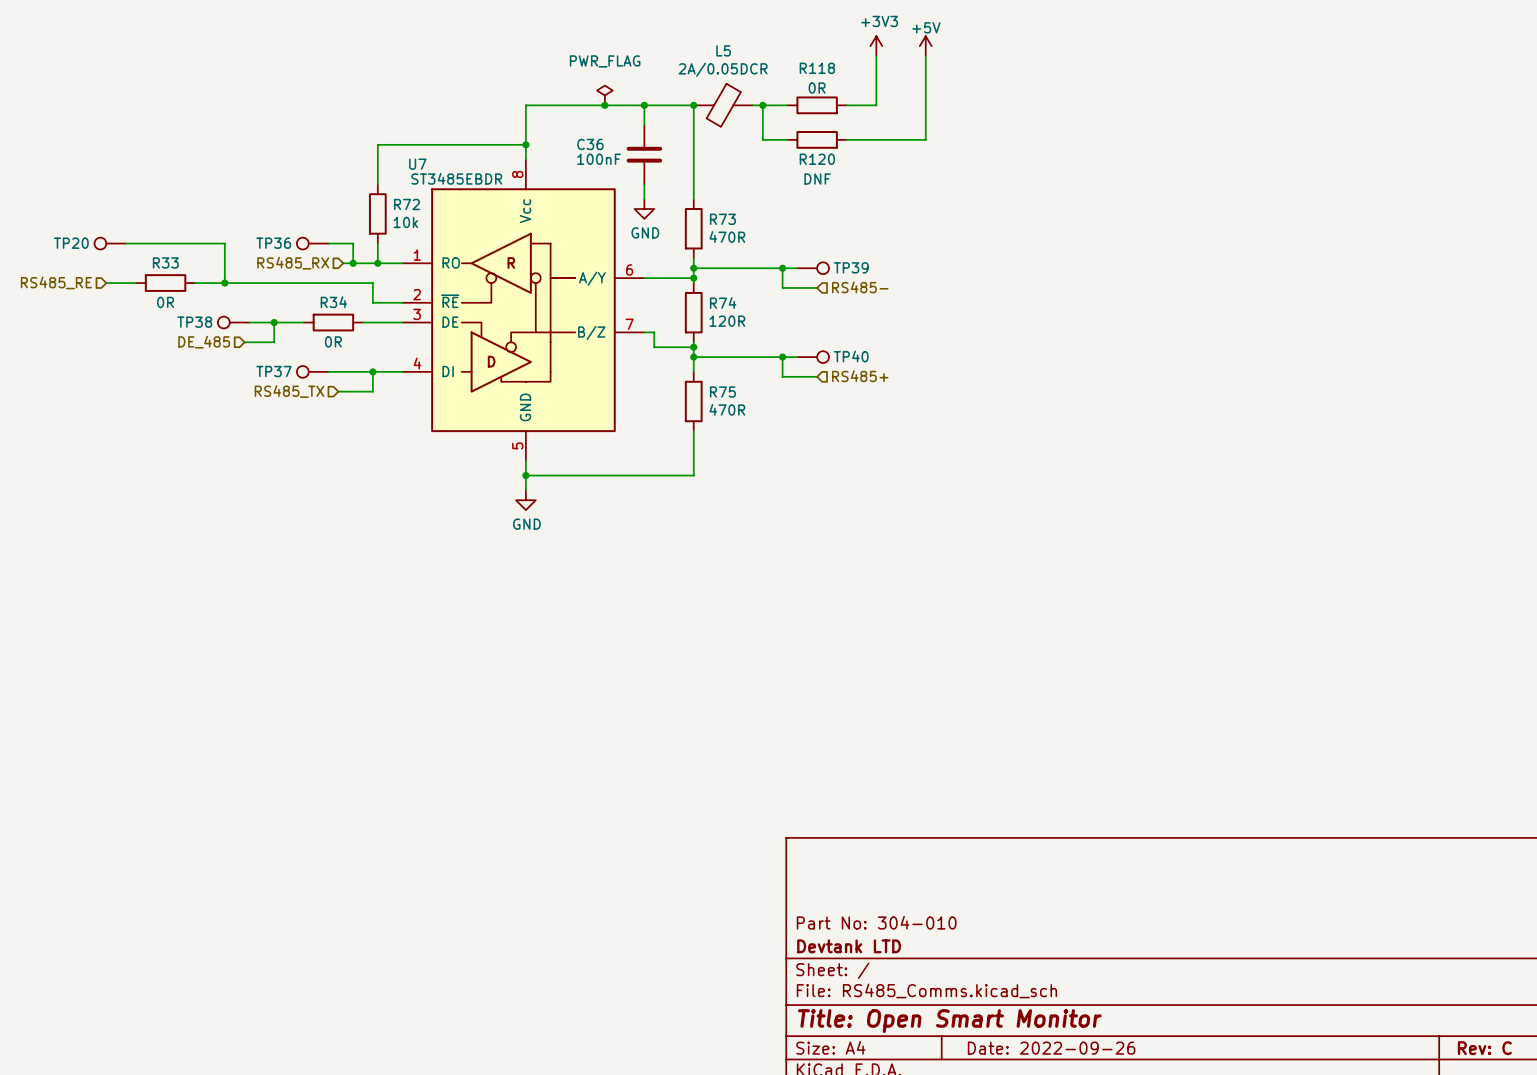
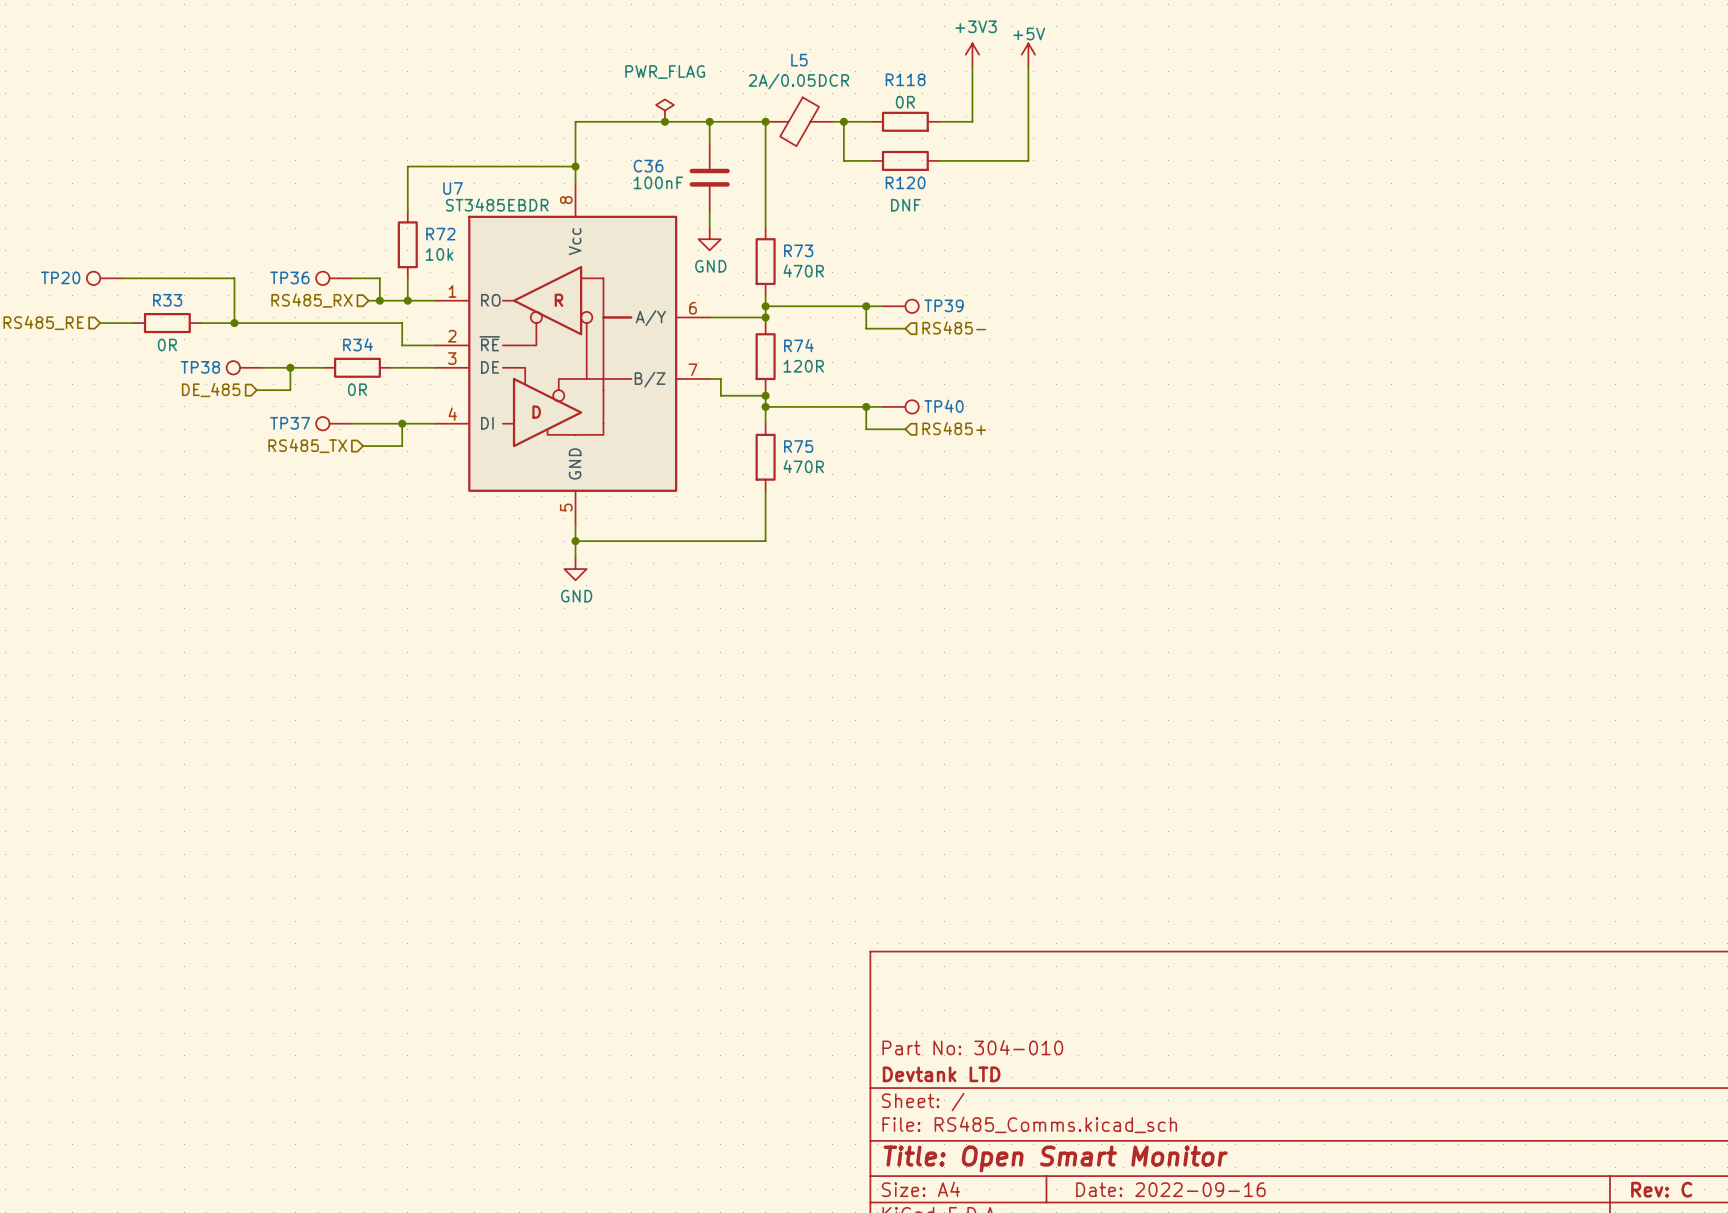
title block: Date: 2022-09-26 (1051, 1048) -> Date: 2022-09-16 (1170, 1189)

